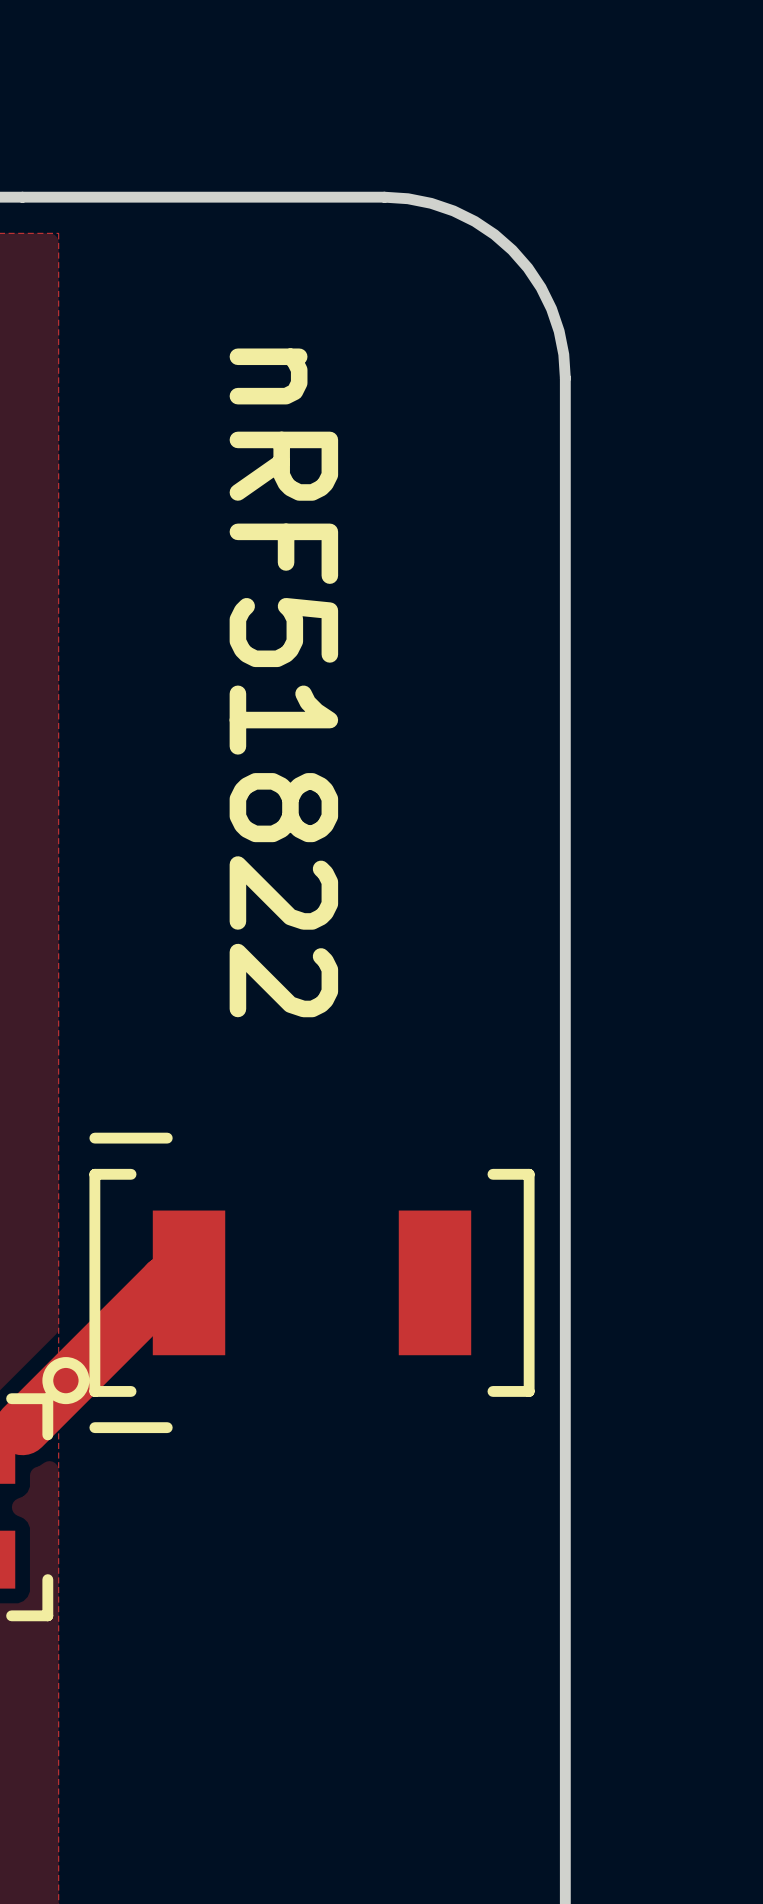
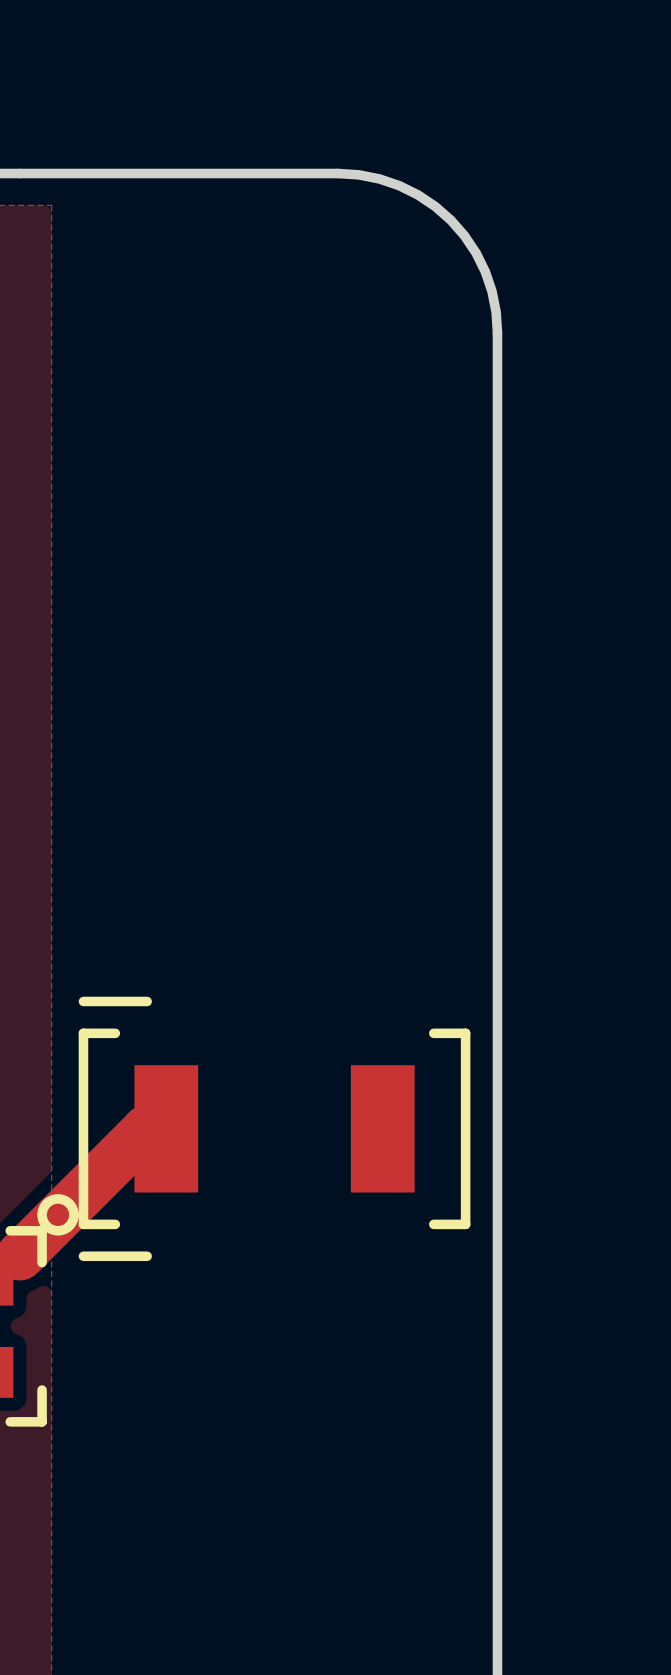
text: nRF51822 (283, 682) -> none

